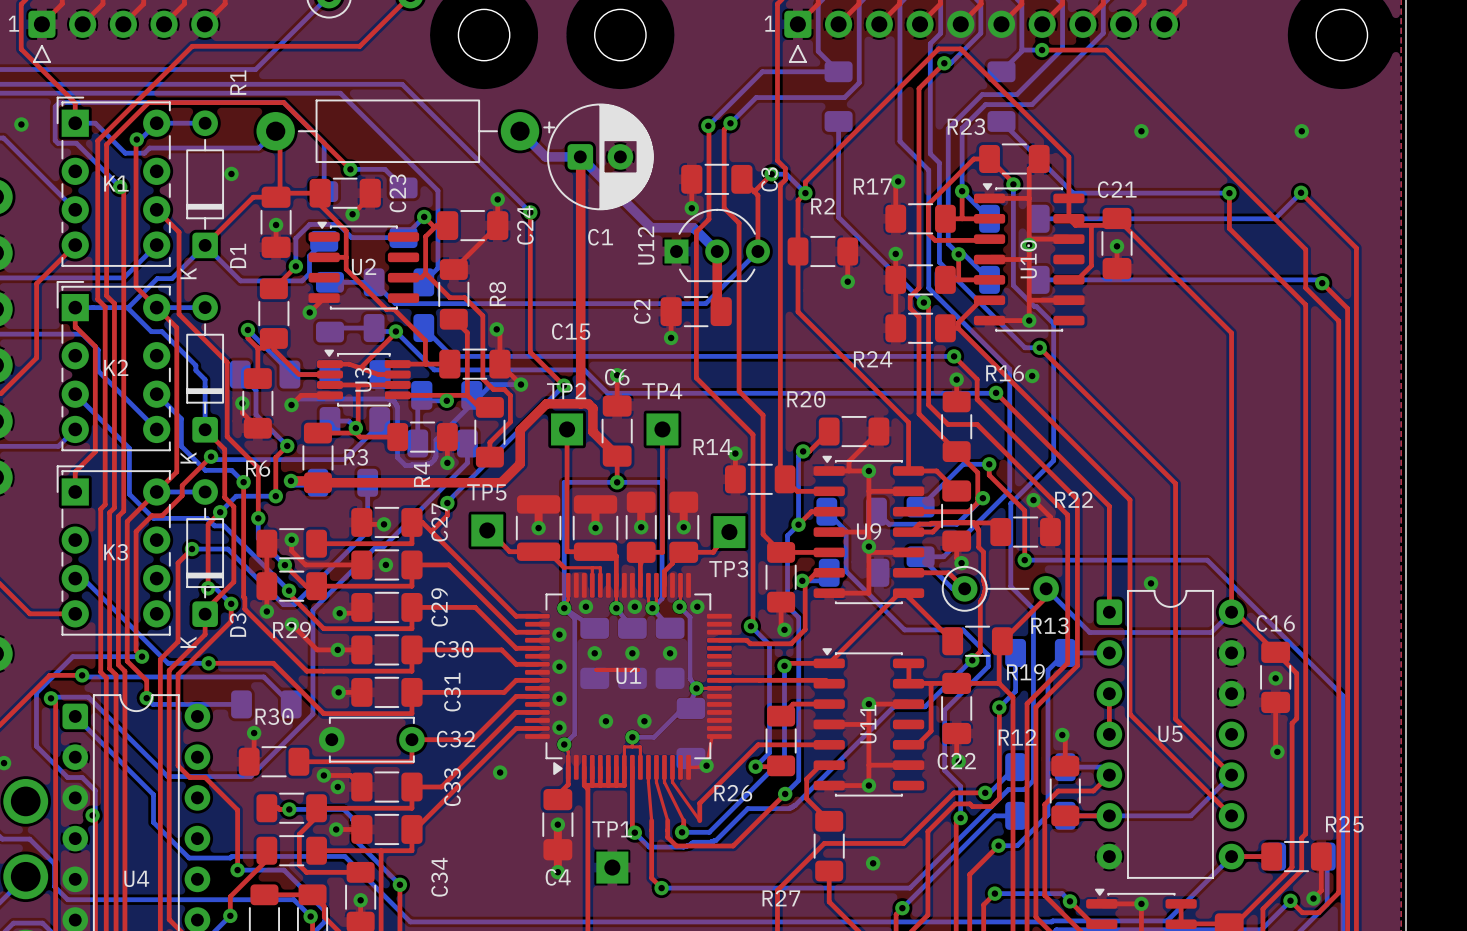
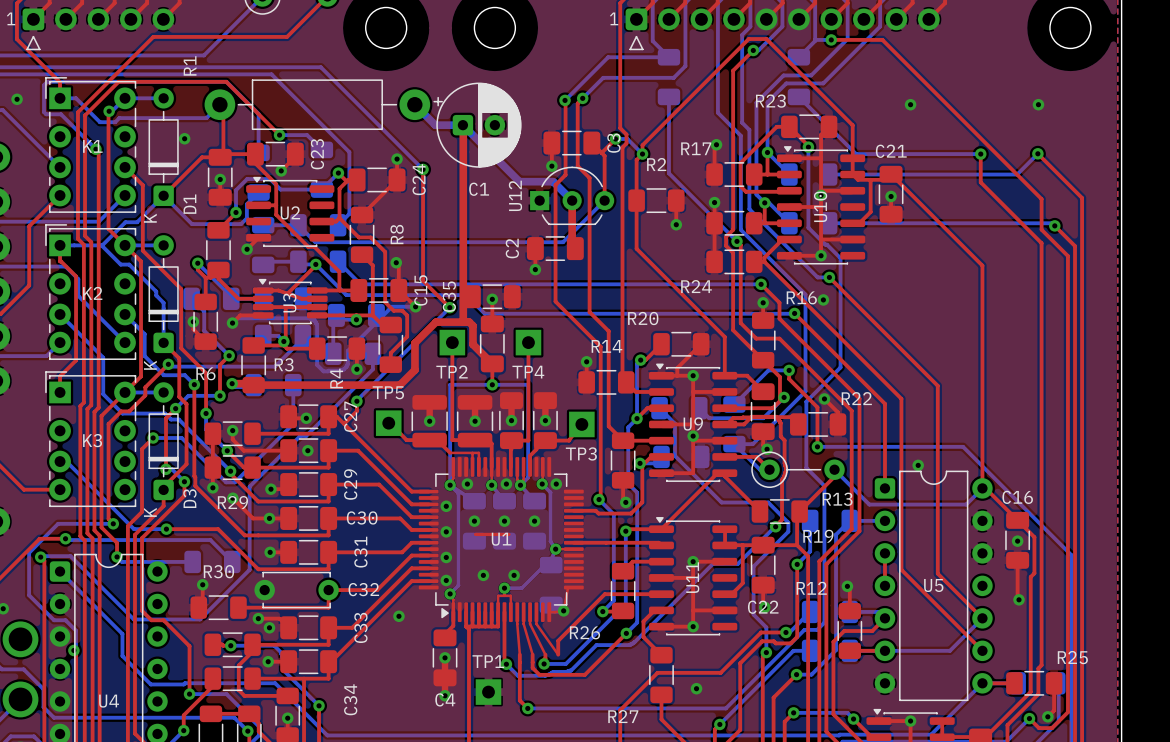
C15 name rotation: 0° (571, 331) -> 90° counterclockwise (420, 290)
C35: none -> (492, 296)
C6 name: C6 (617, 377) -> none
TP2 name position: TP2 (566, 391) -> TP2 (452, 371)
TP4 name position: TP4 (662, 391) -> TP4 (528, 372)
R14 name position: R14 (712, 447) -> R14 (606, 346)

